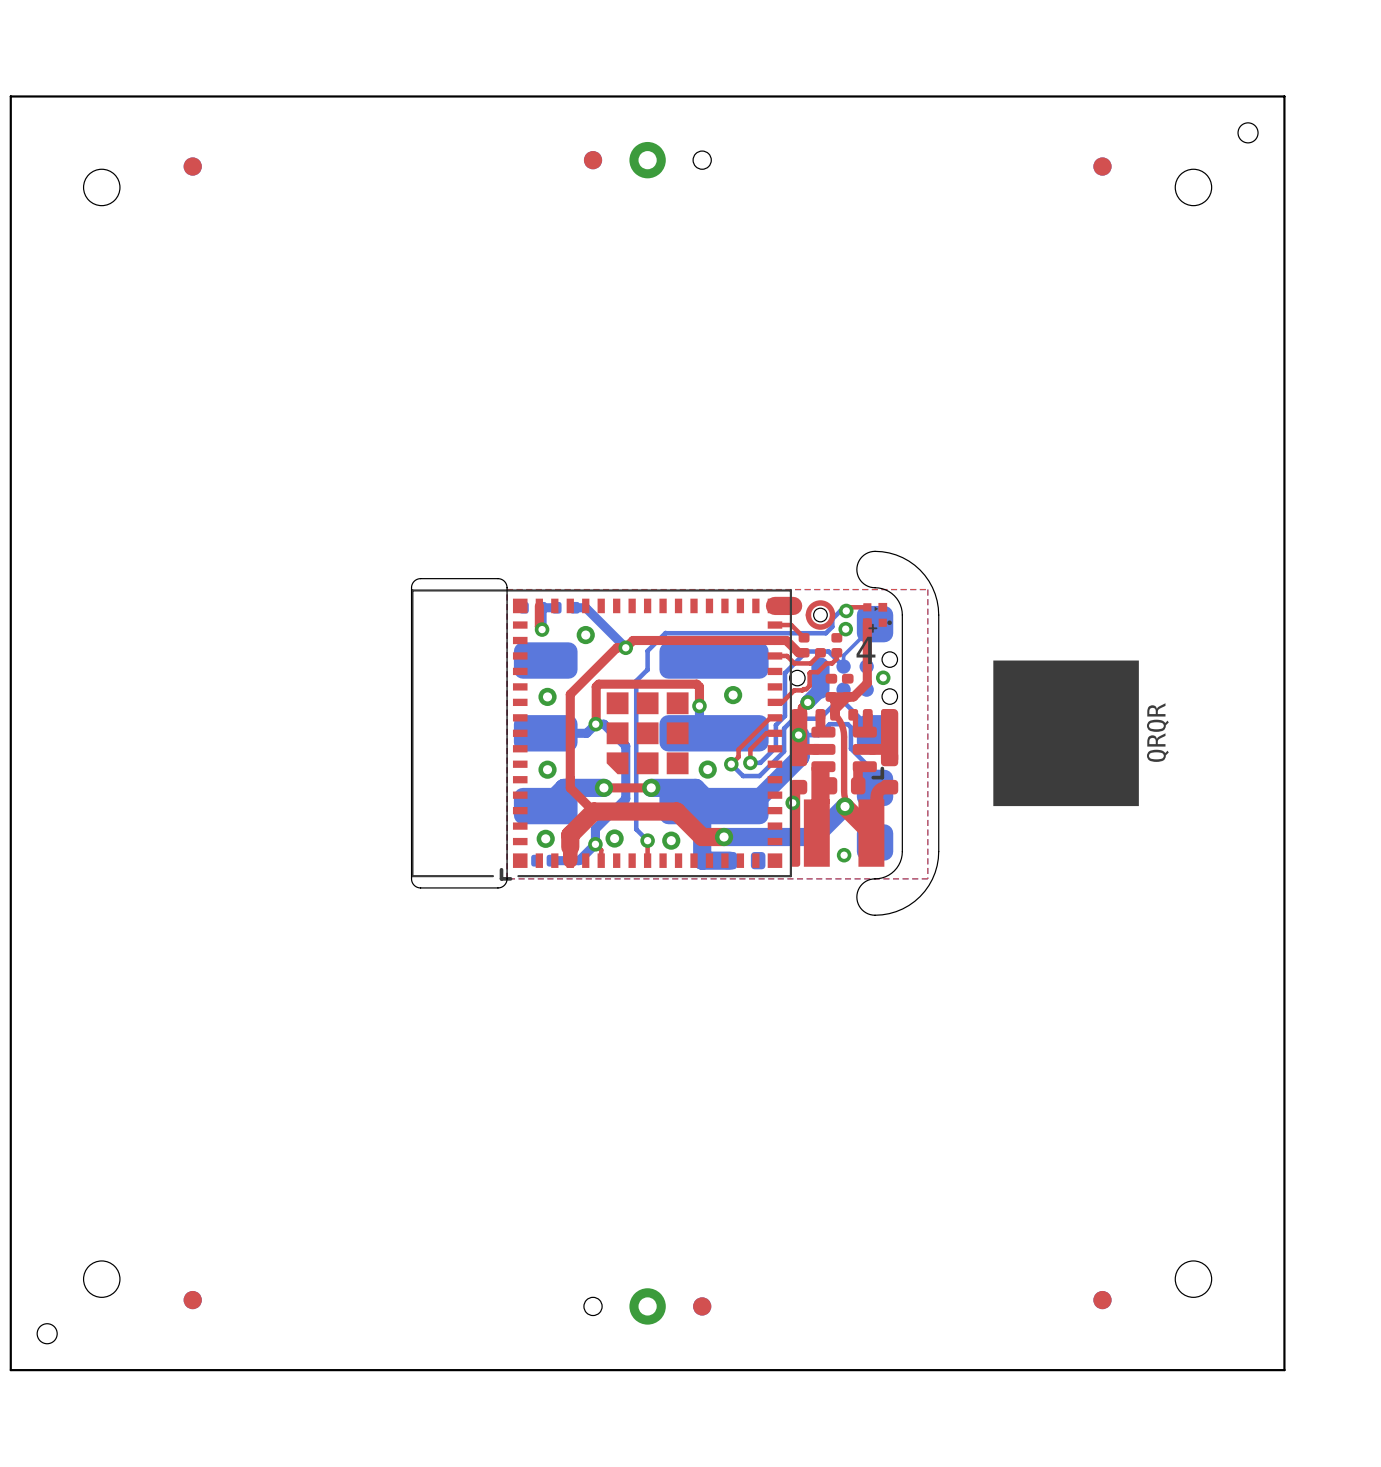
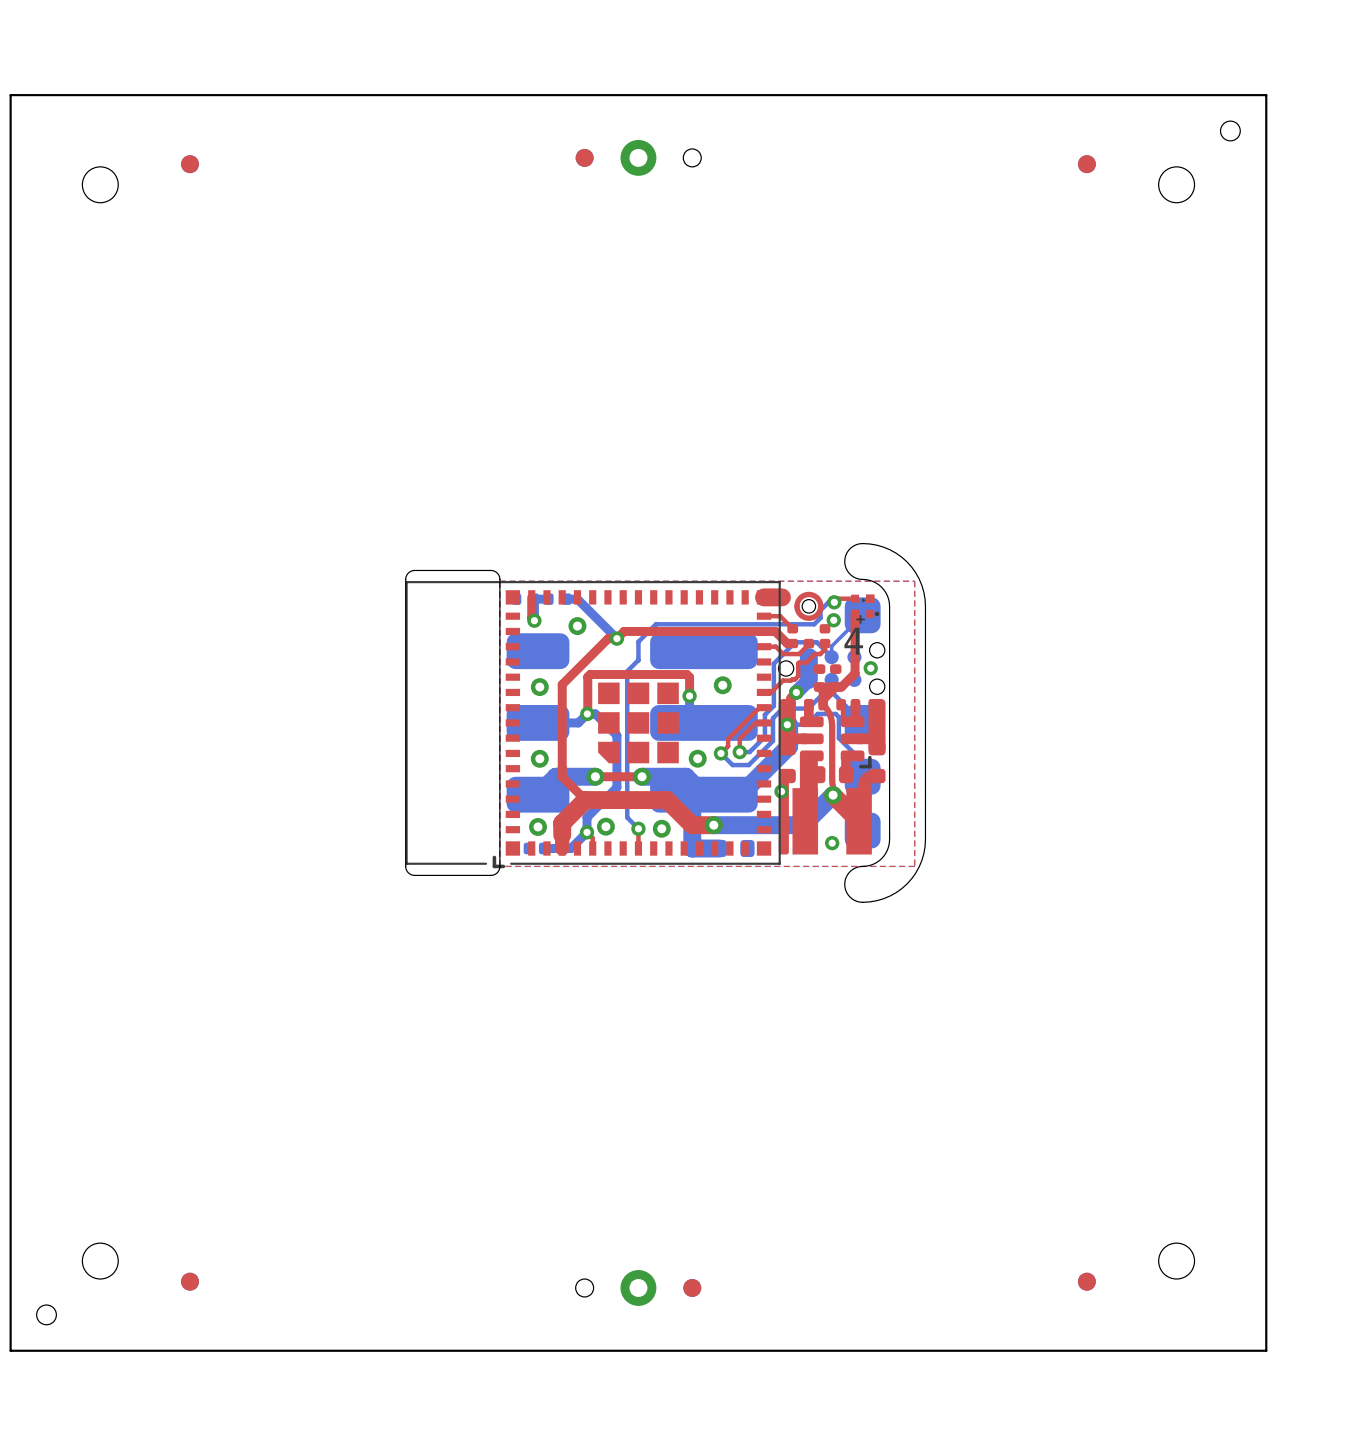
drawing: [993, 660, 1139, 807] -> none
text: QRQR (1157, 732) -> none

